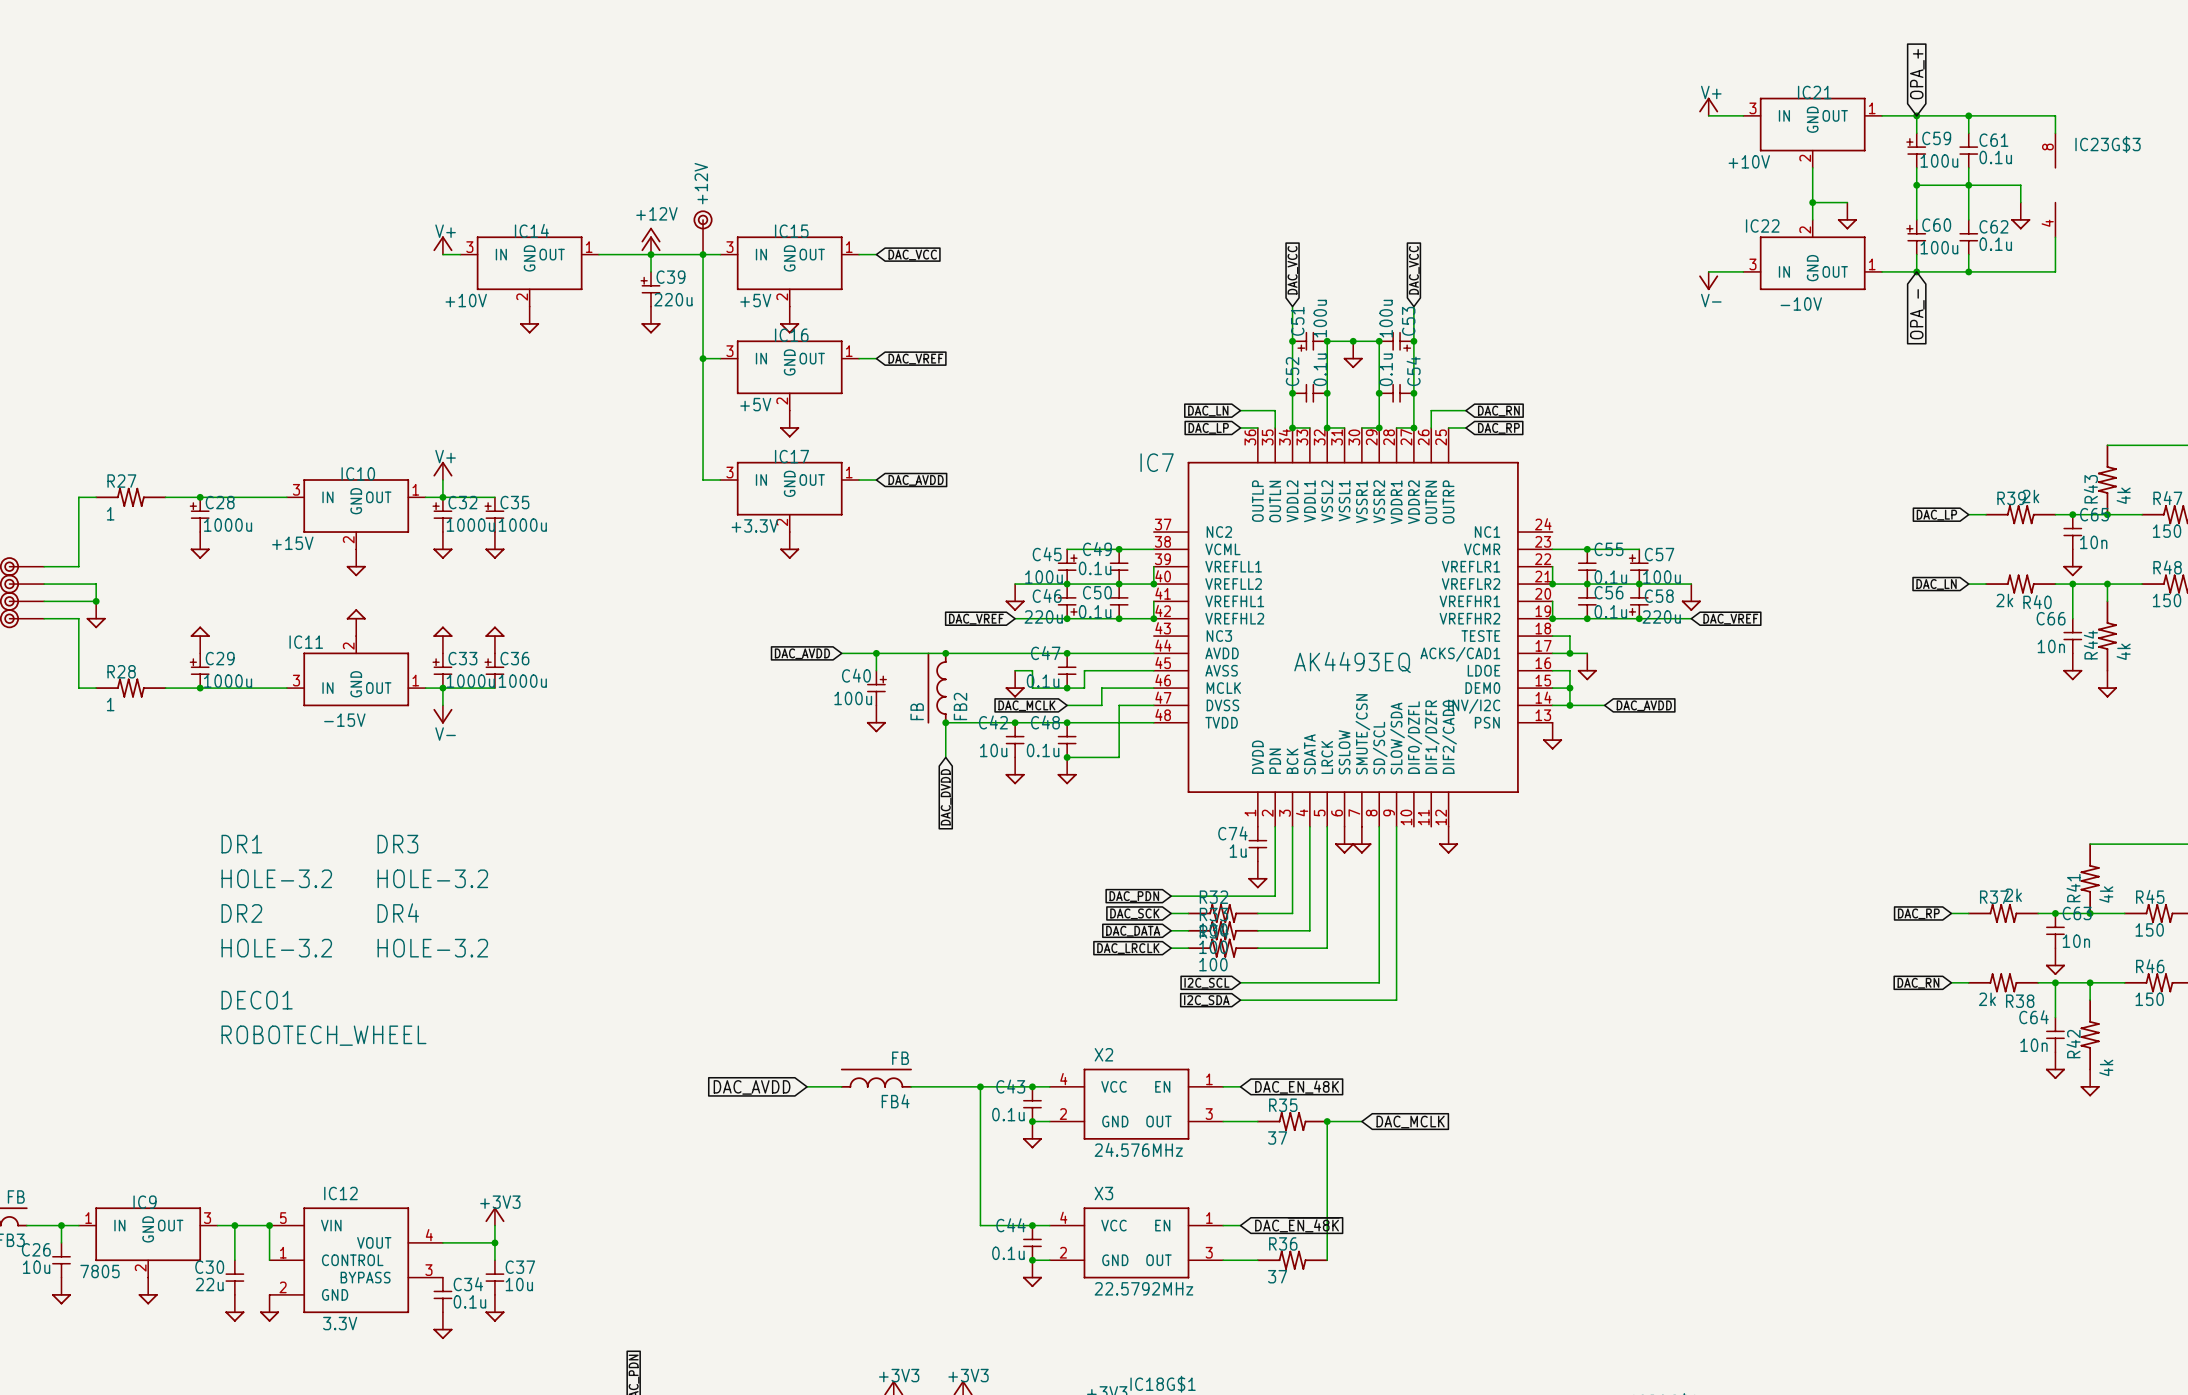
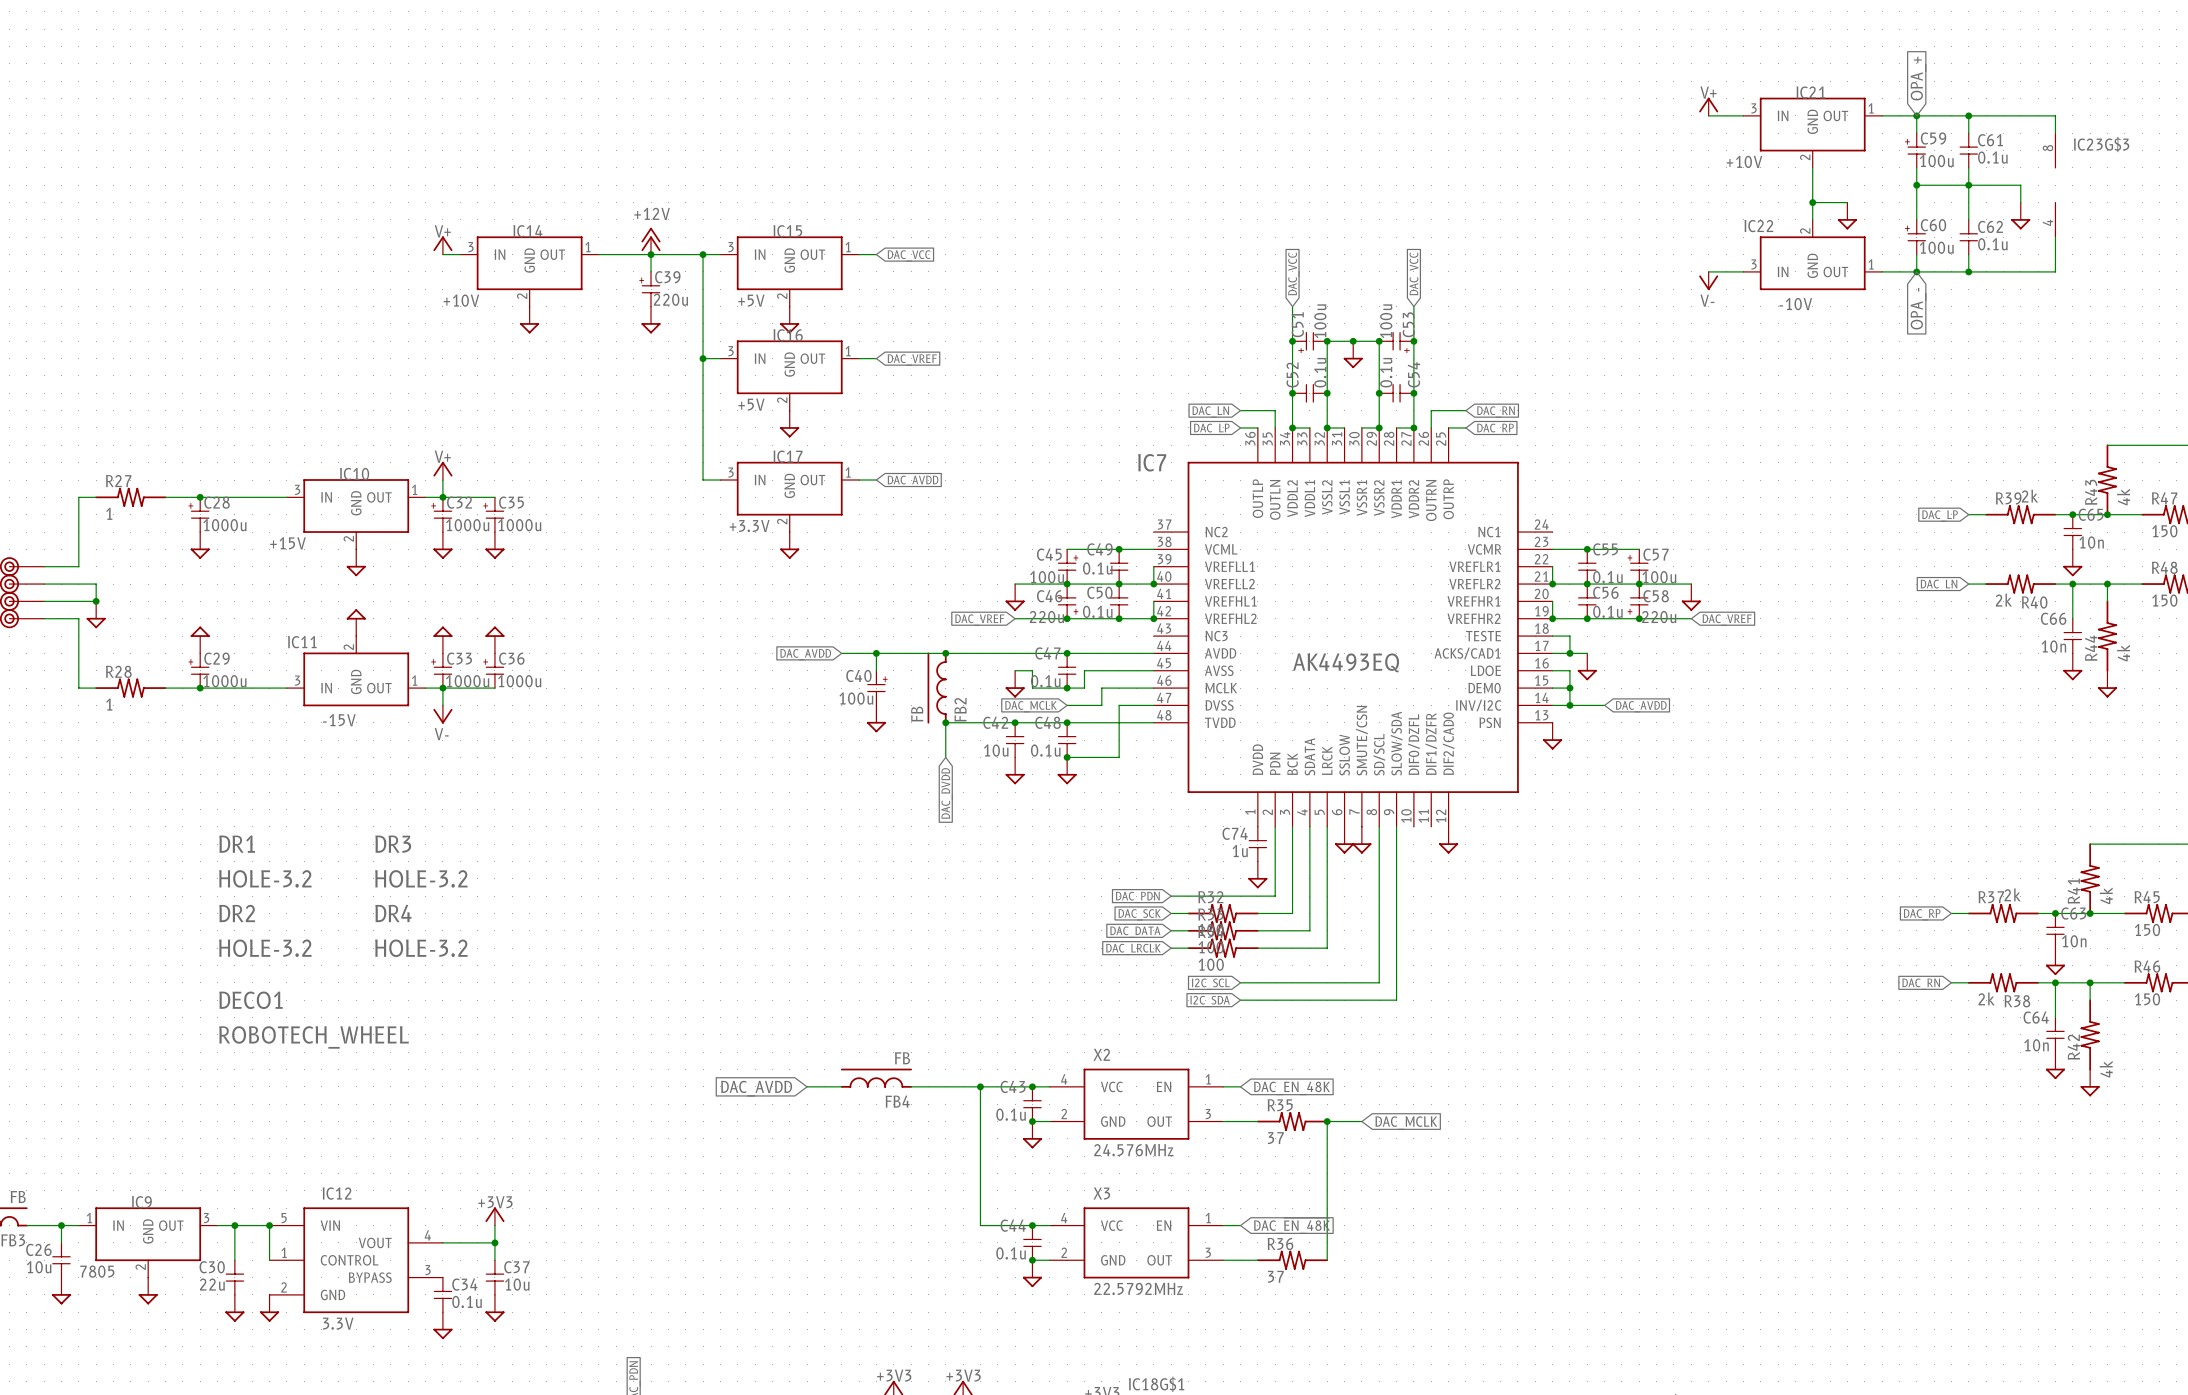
part: +12V (703, 232) -> none

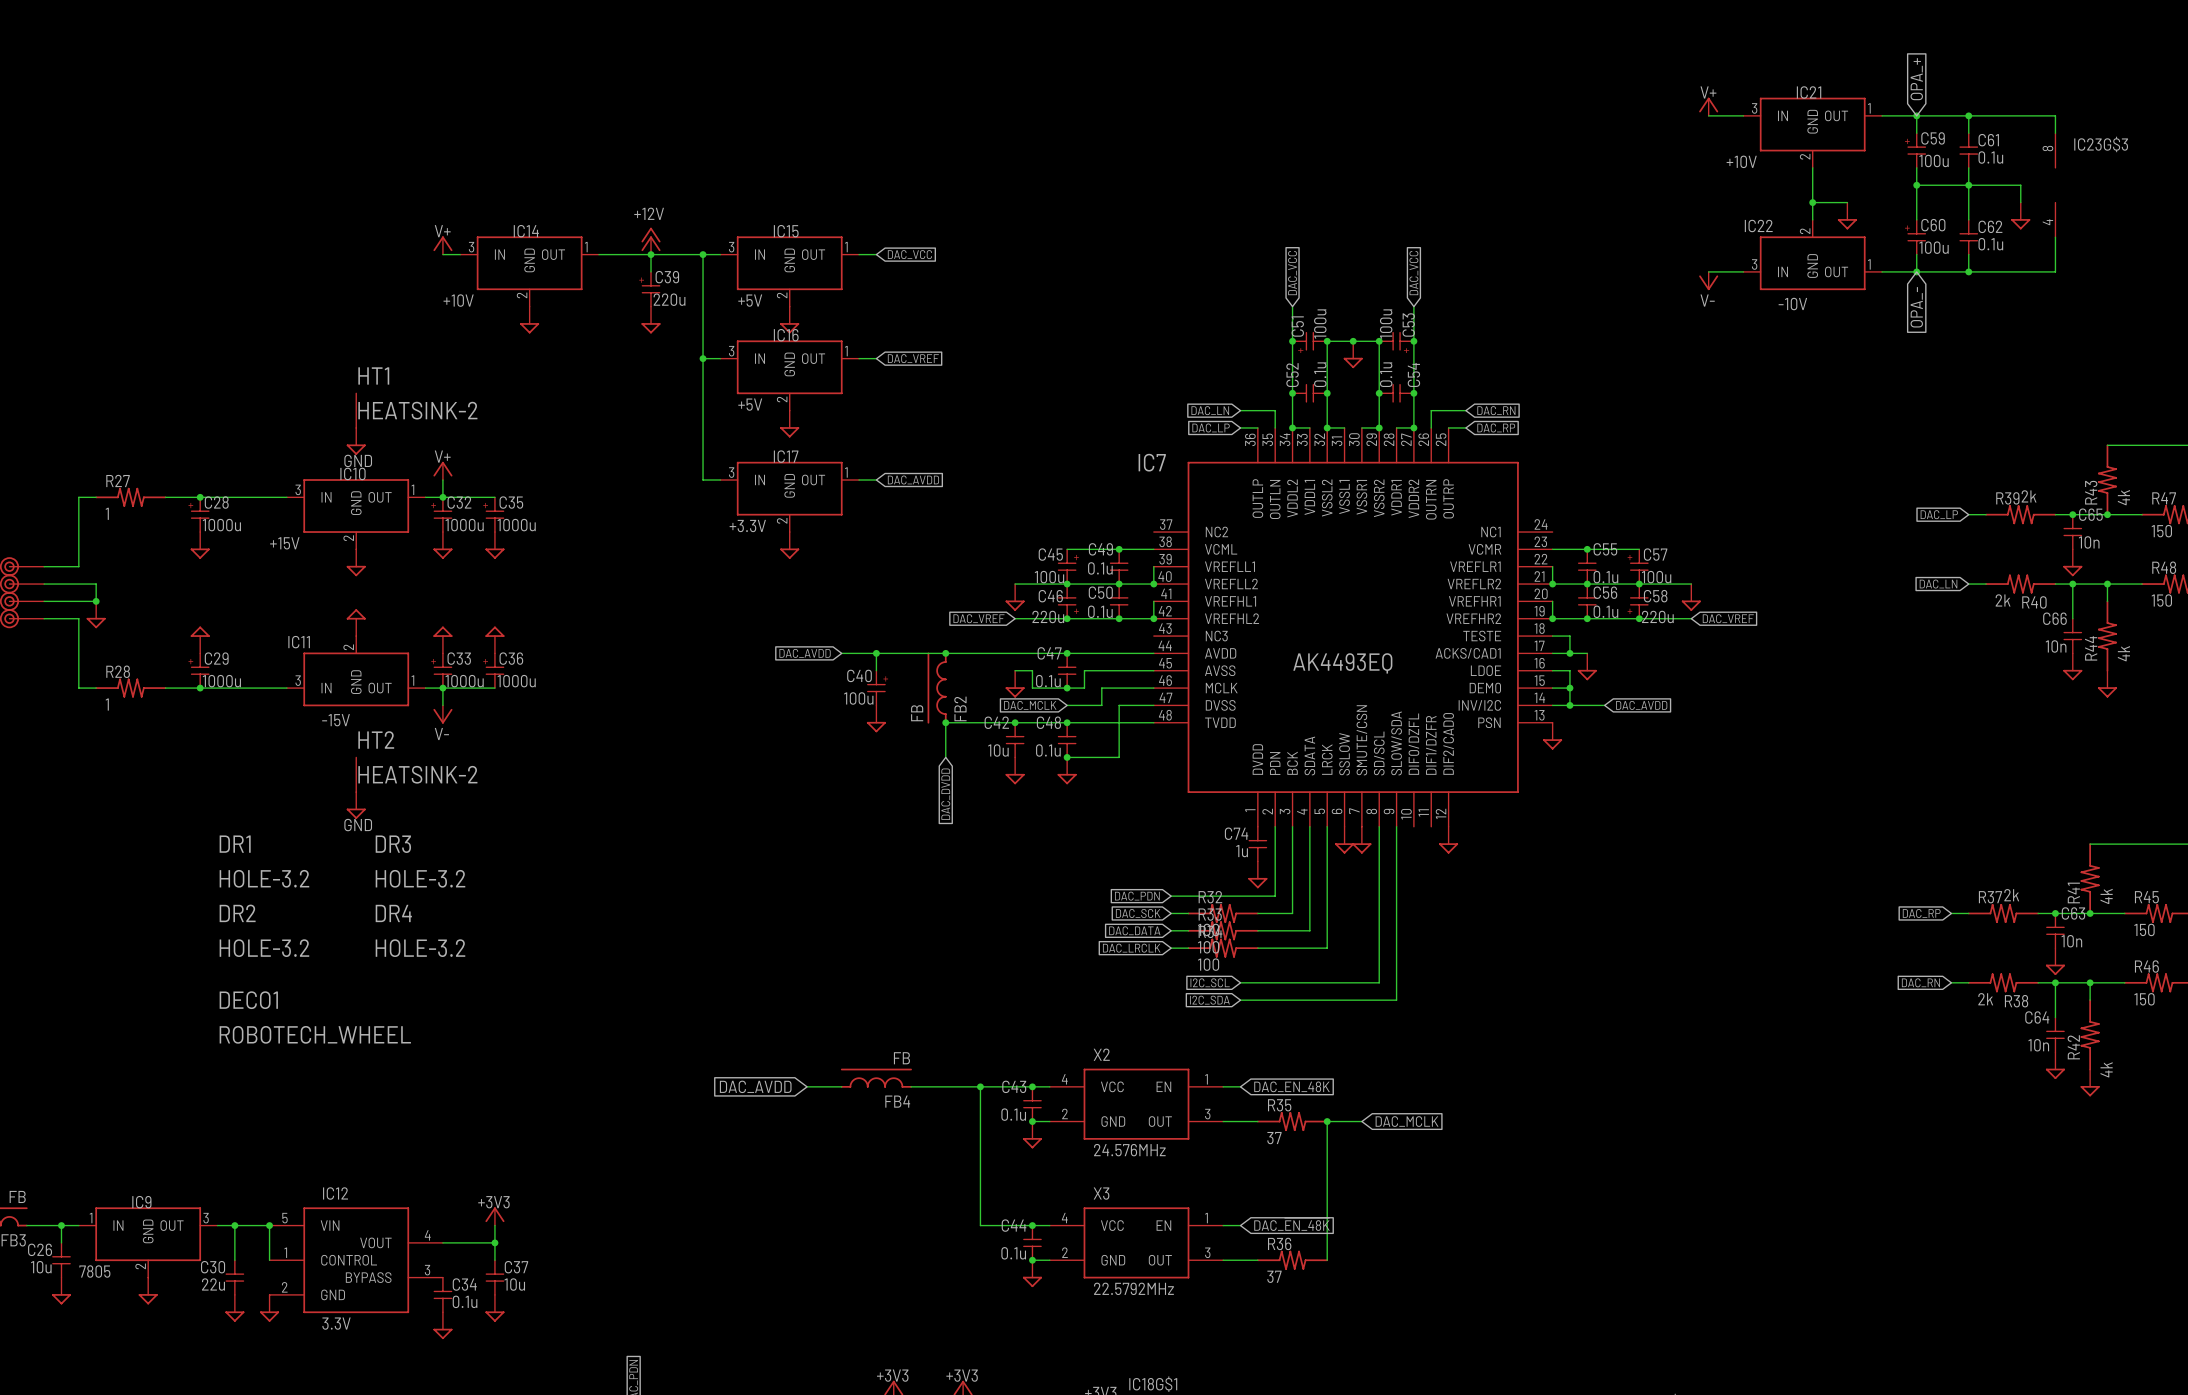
HT1: none -> HEATSINK-2 (356, 410)
power symbol: none -> GND (356, 441)
HT2: none -> HEATSINK-2 (356, 774)
power symbol: none -> GND (356, 805)

